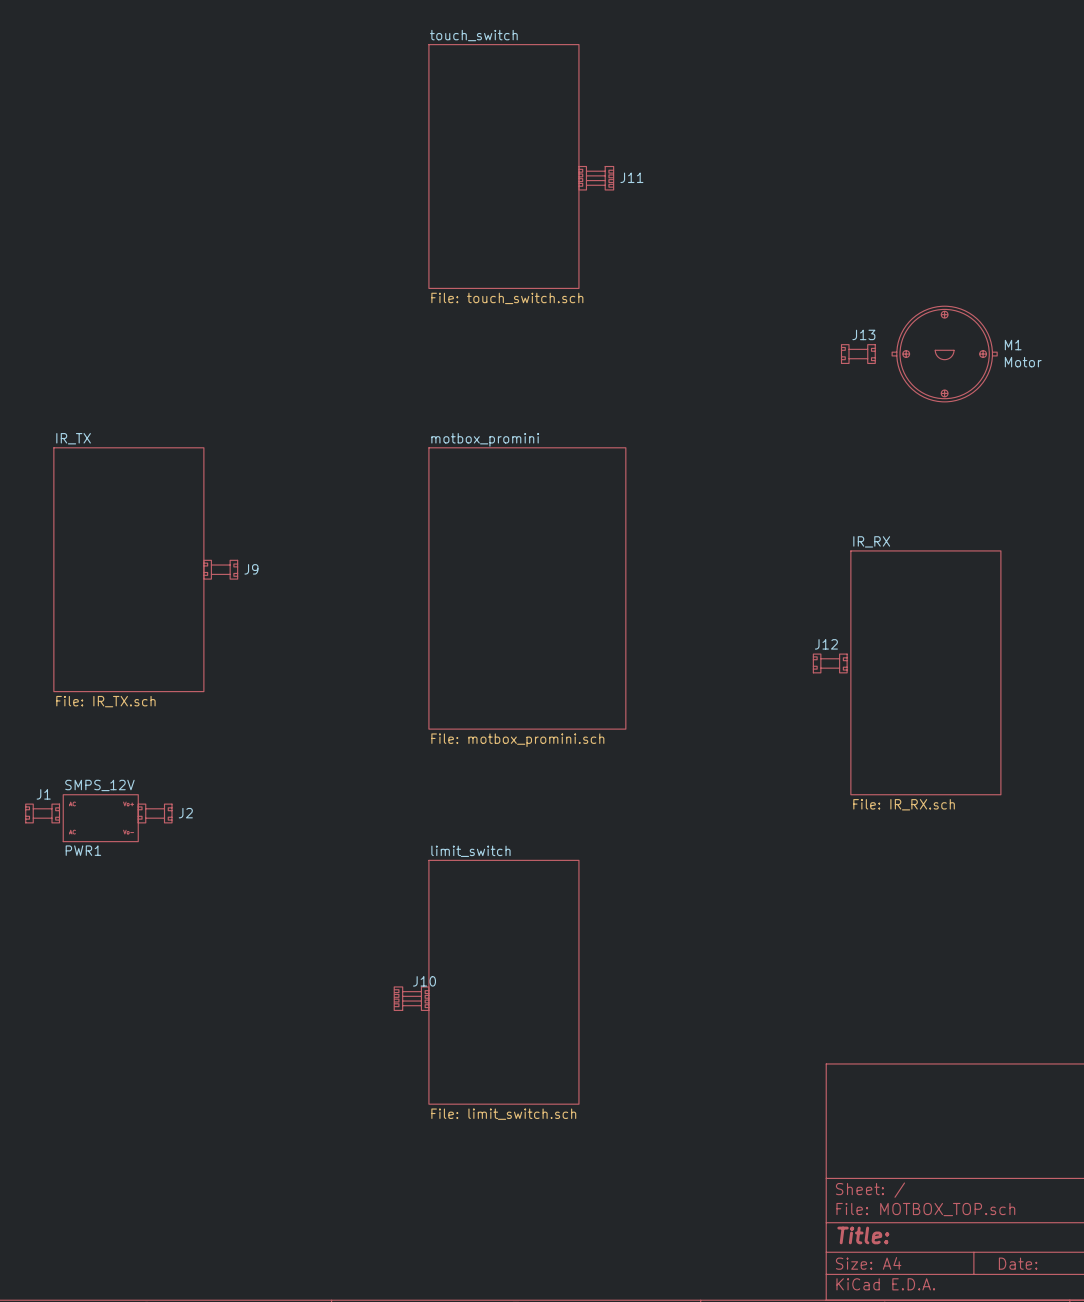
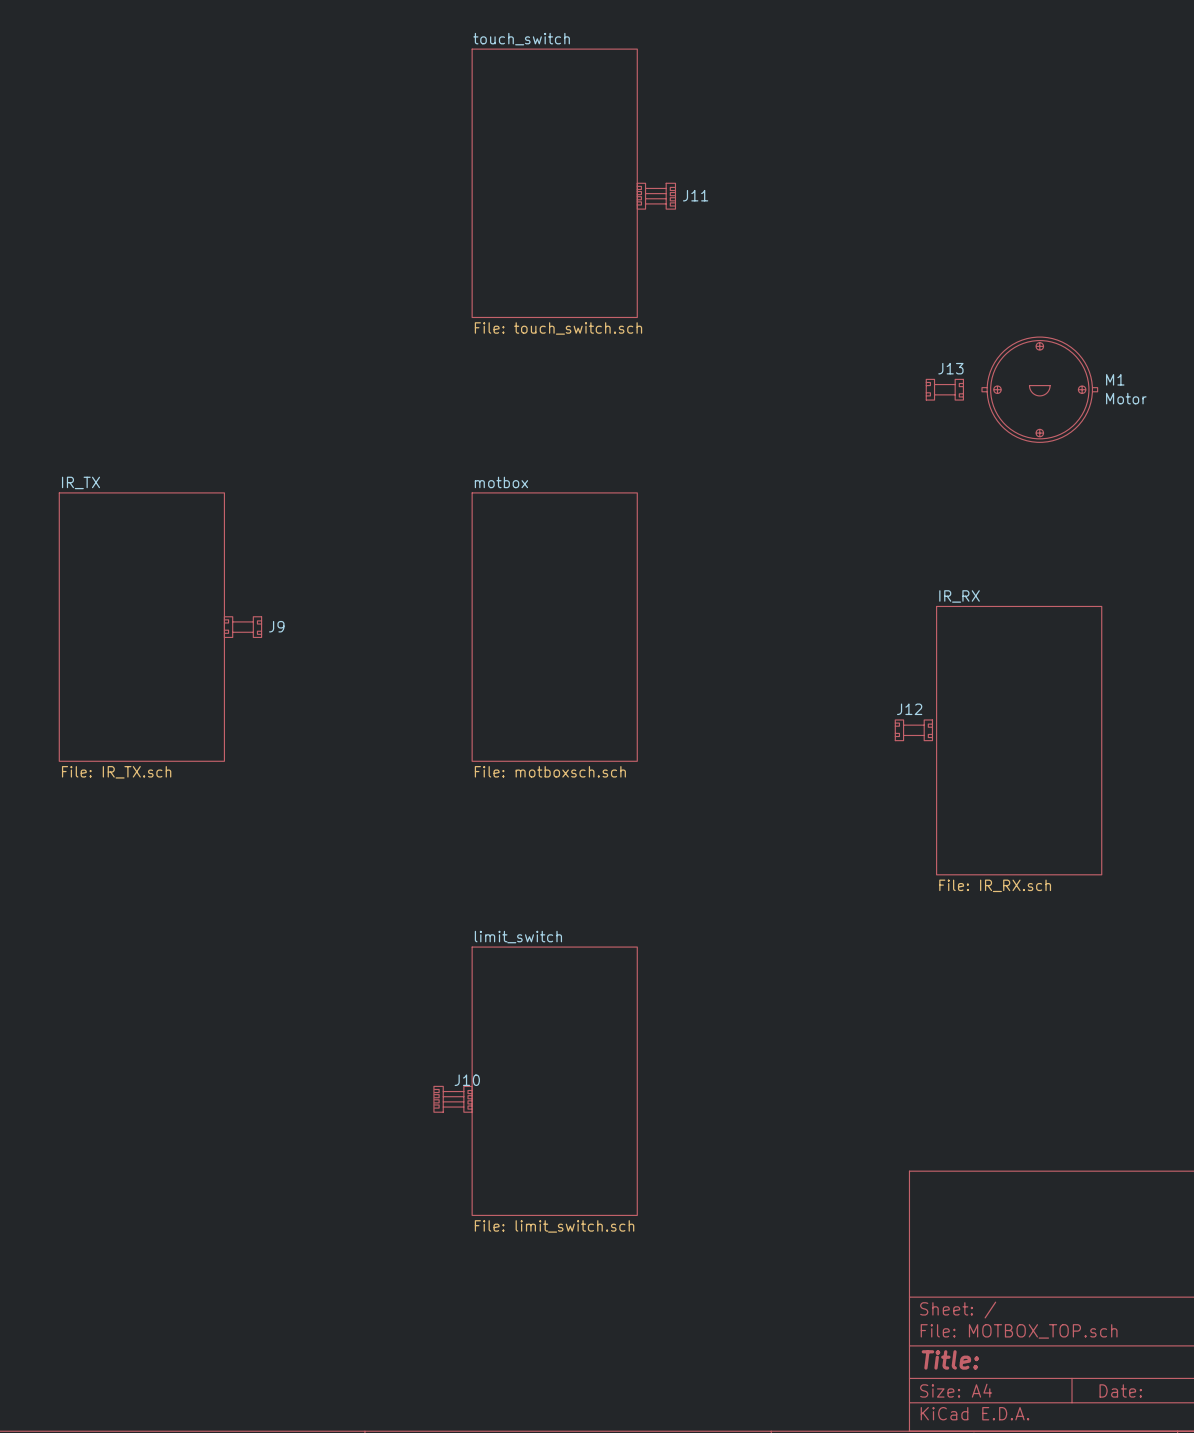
sheet motbox: none -> File: motboxsch.sch (554, 627)
sheet motbox_promini: File: motbox_promini.sch (527, 588) -> none
J1: (42, 813) -> none
J2: (155, 813) -> none
PWR1: SMPS_12V (100, 818) -> none

